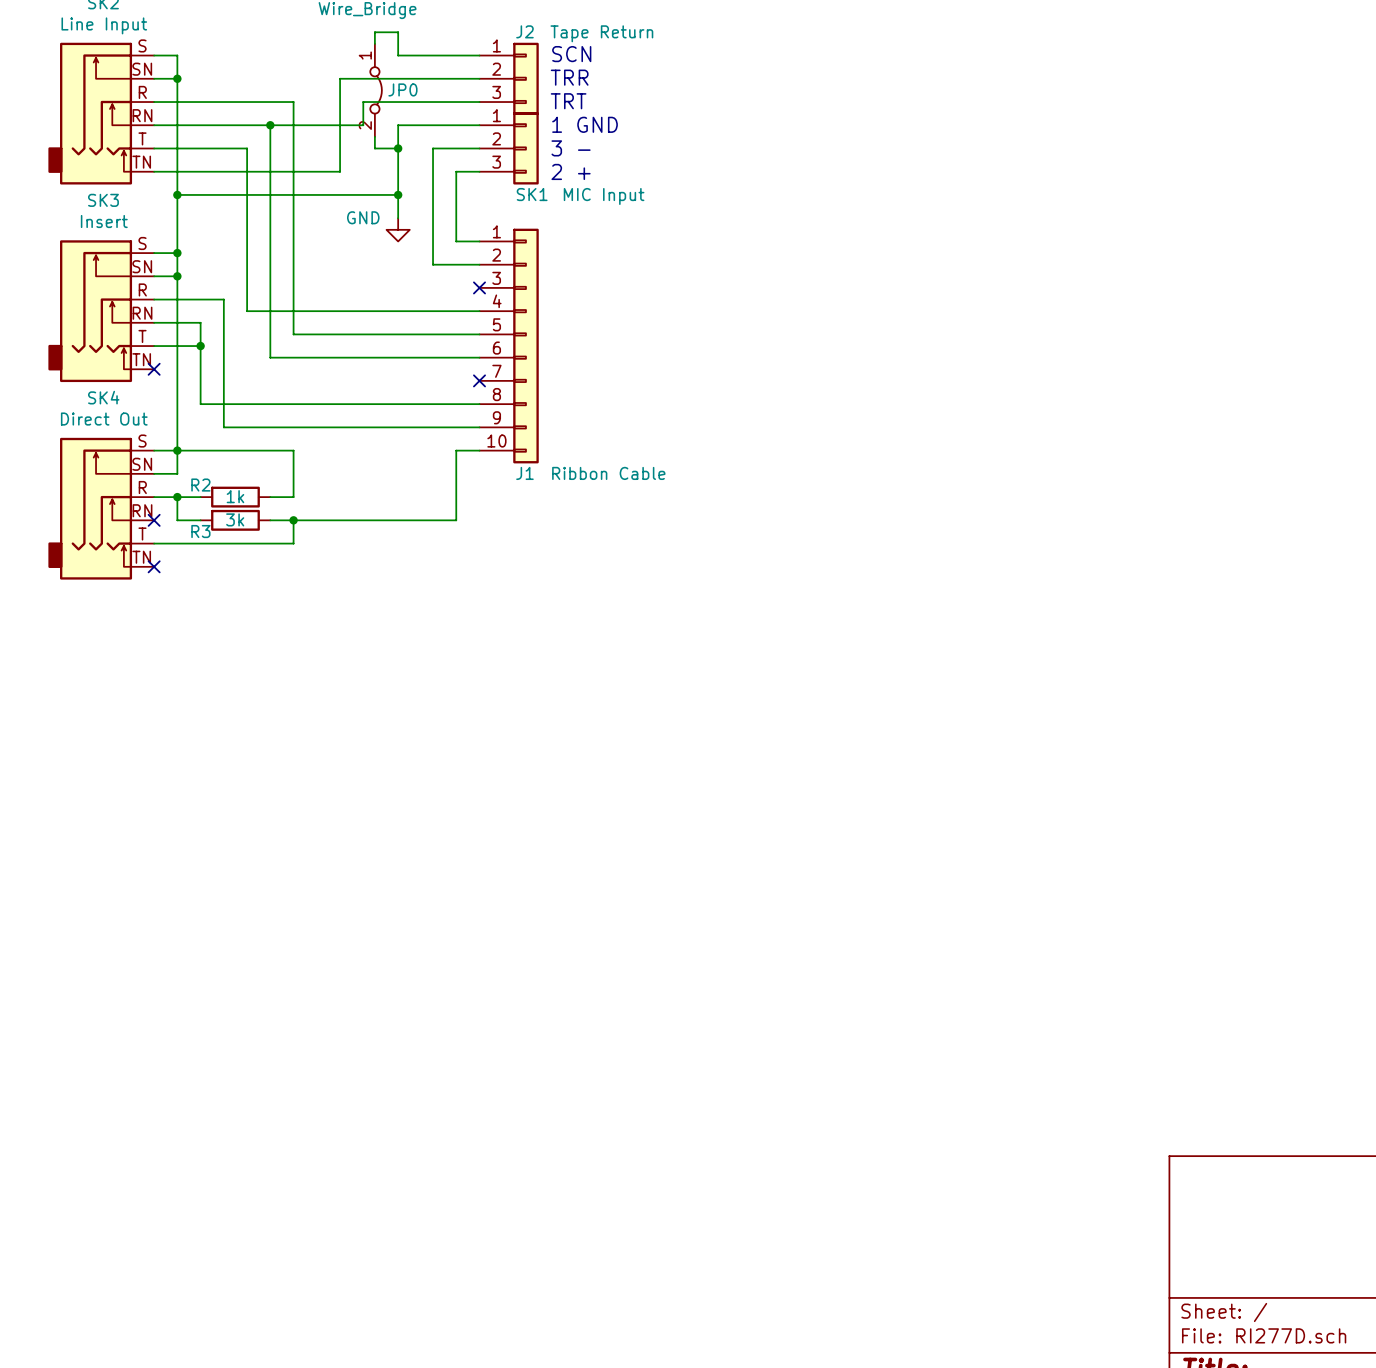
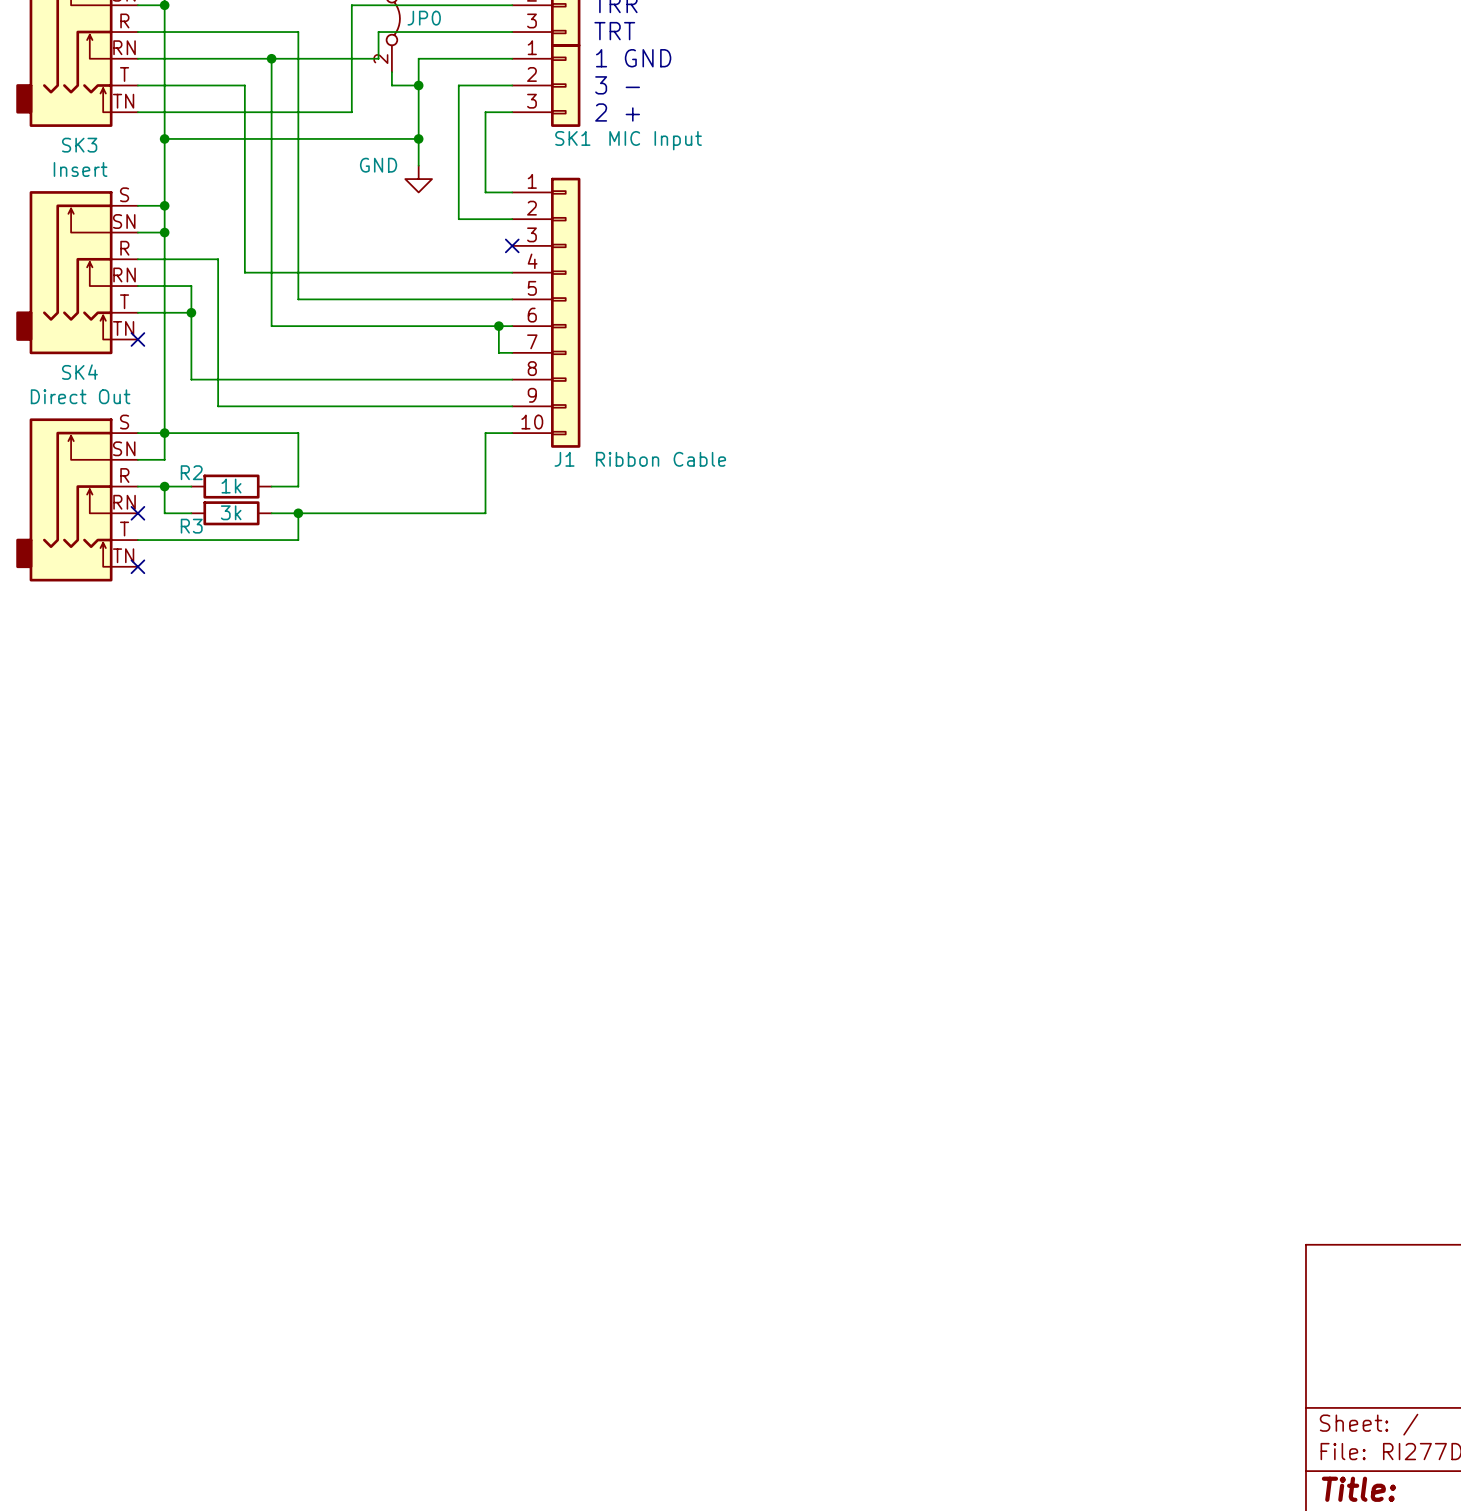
wire: none -> (498, 326) (498, 352) (512, 352)
junction: none -> (498, 326)
no-connect mark: (479, 380) -> none

